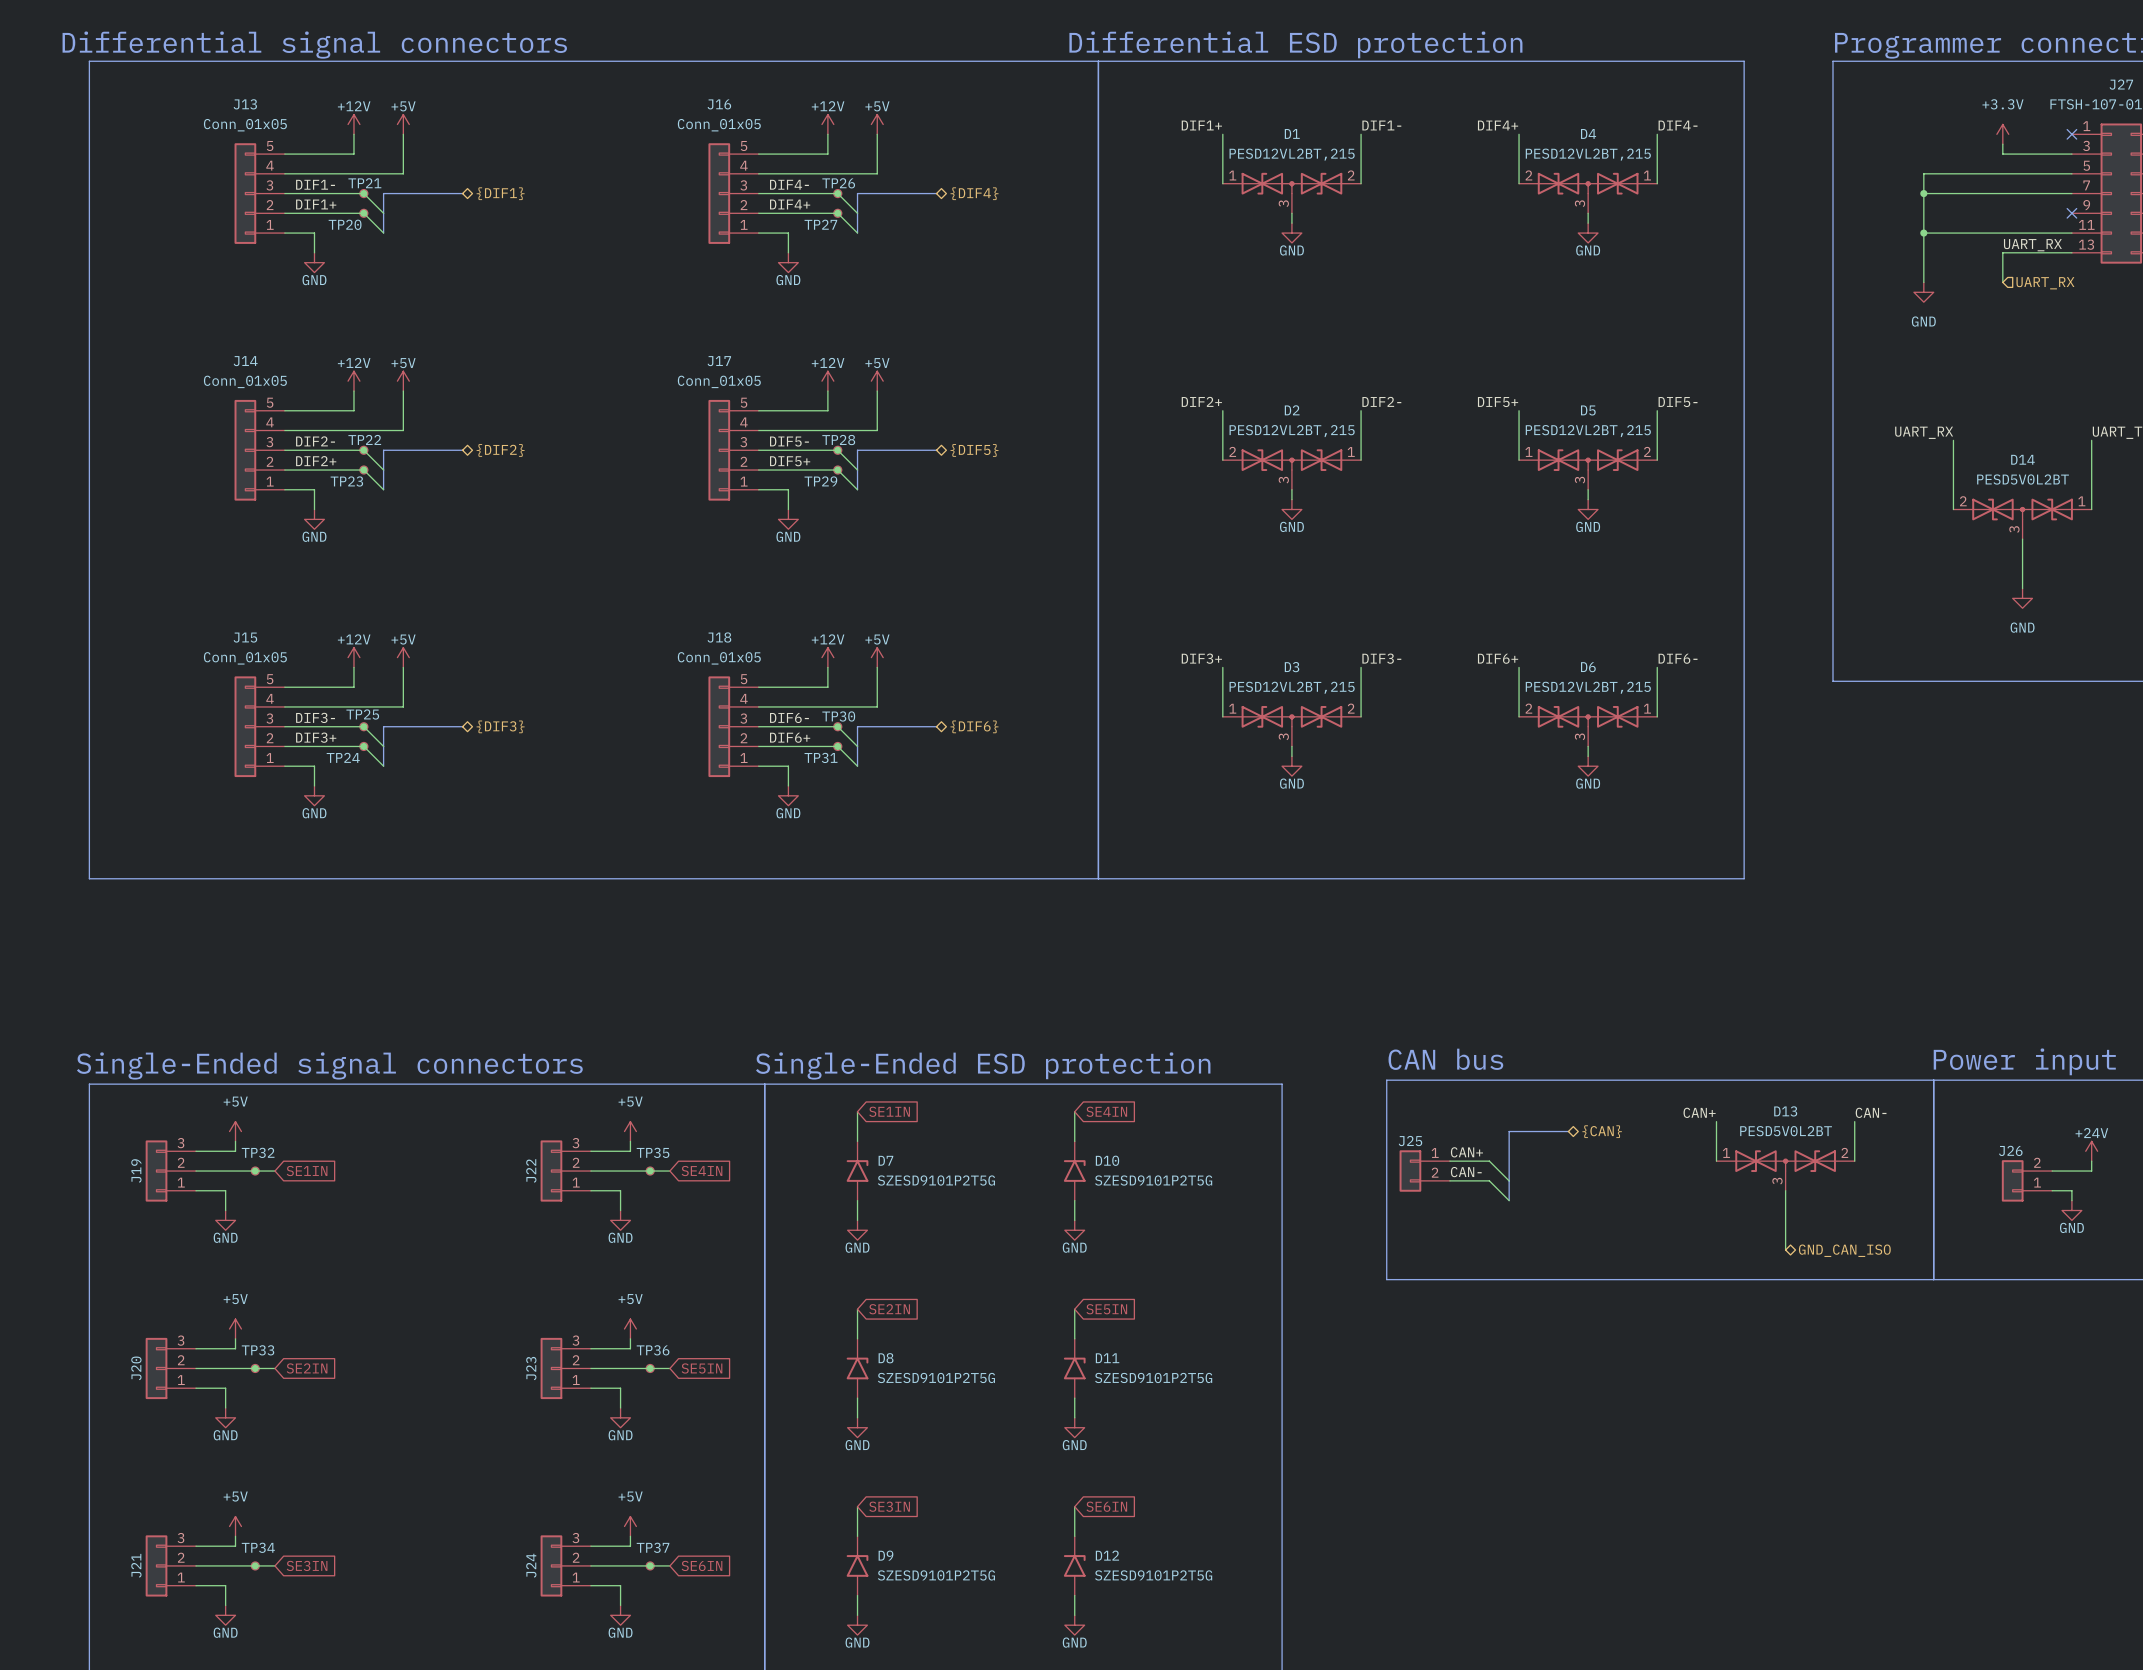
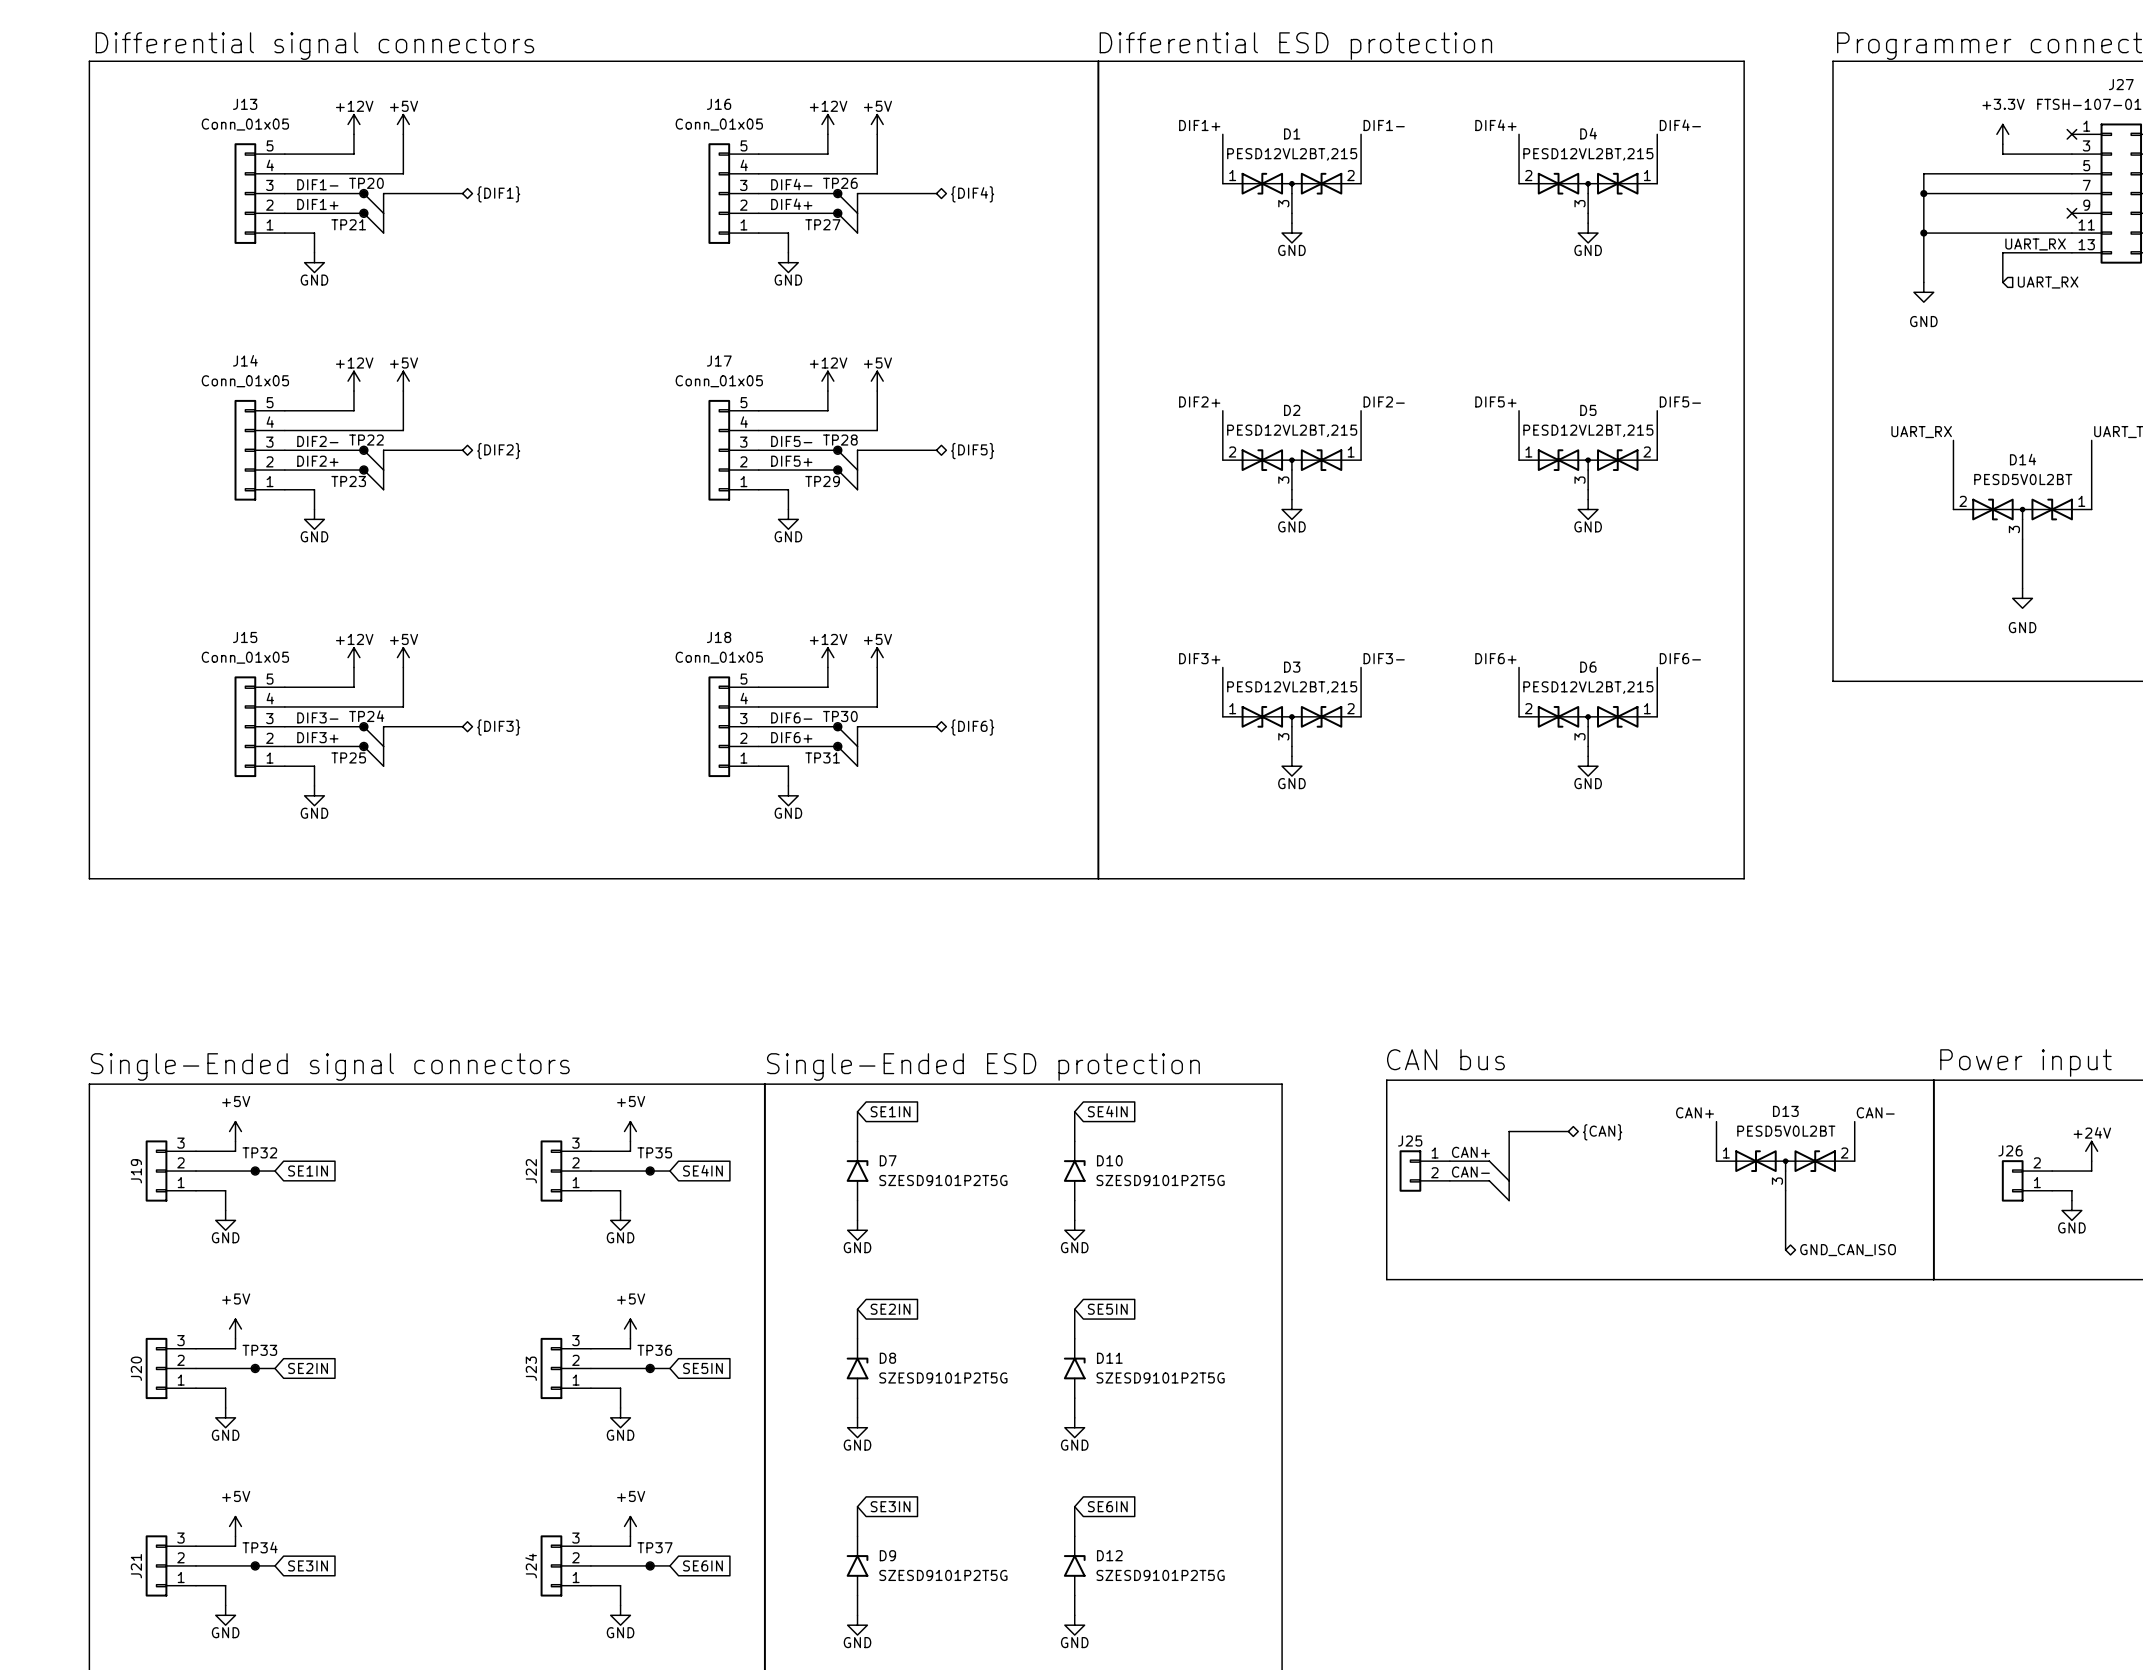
TP21 name: TP21 (364, 183) -> TP20 (366, 183)
TP20 name: TP20 (345, 224) -> TP21 (348, 224)
TP25 name: TP25 (362, 714) -> TP24 (366, 716)
TP24 name: TP24 (343, 757) -> TP25 (348, 757)

